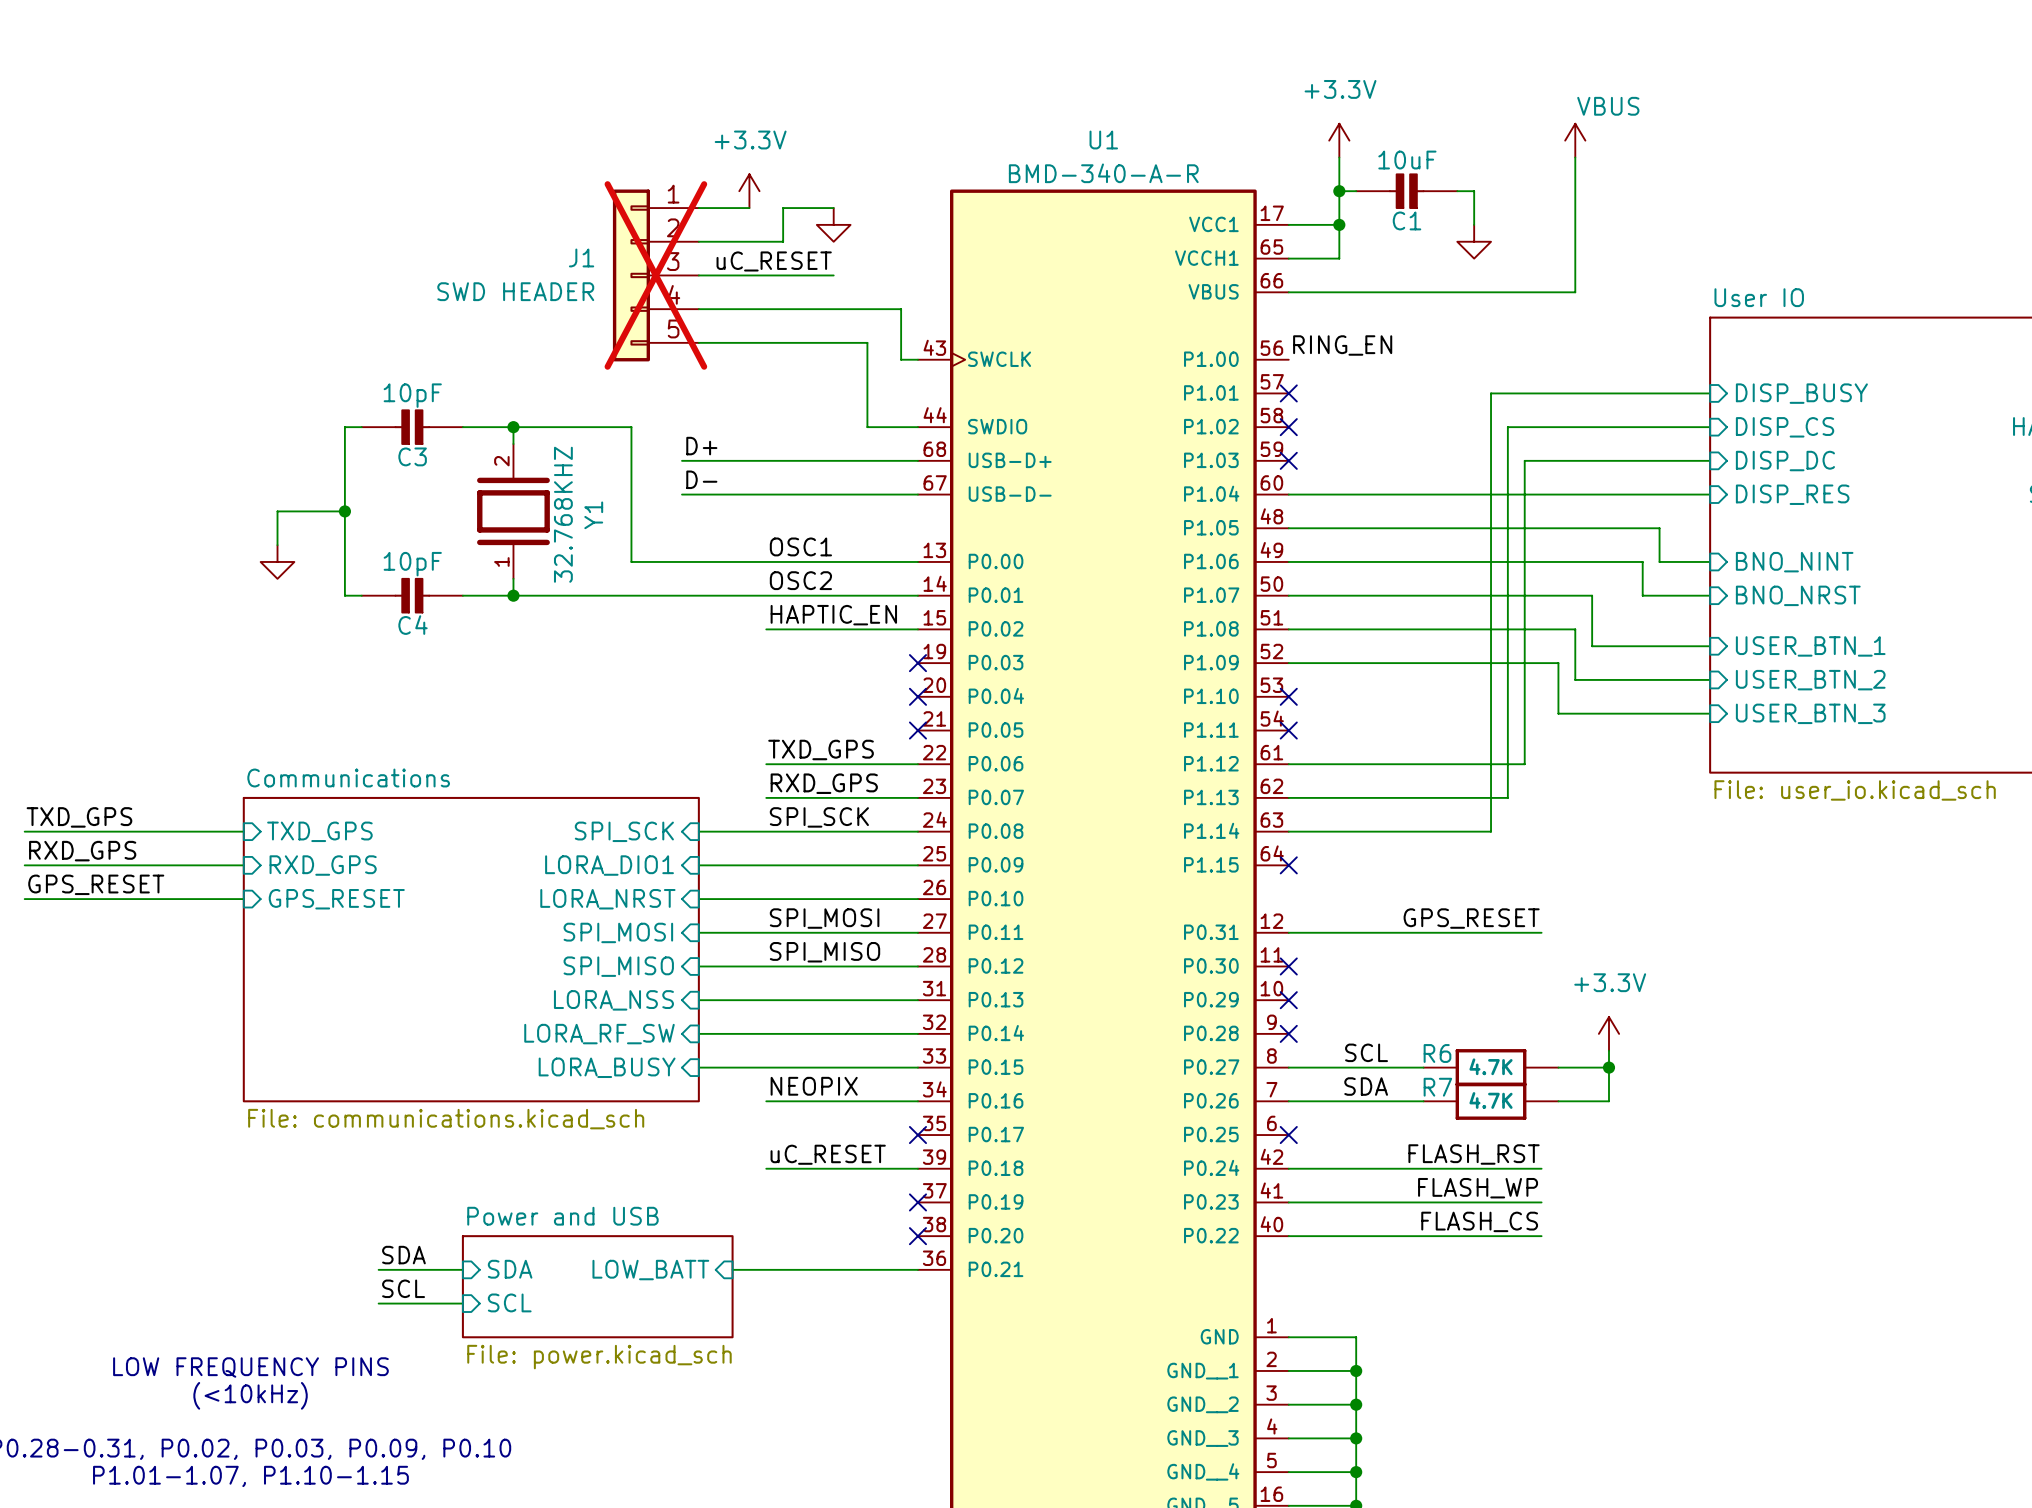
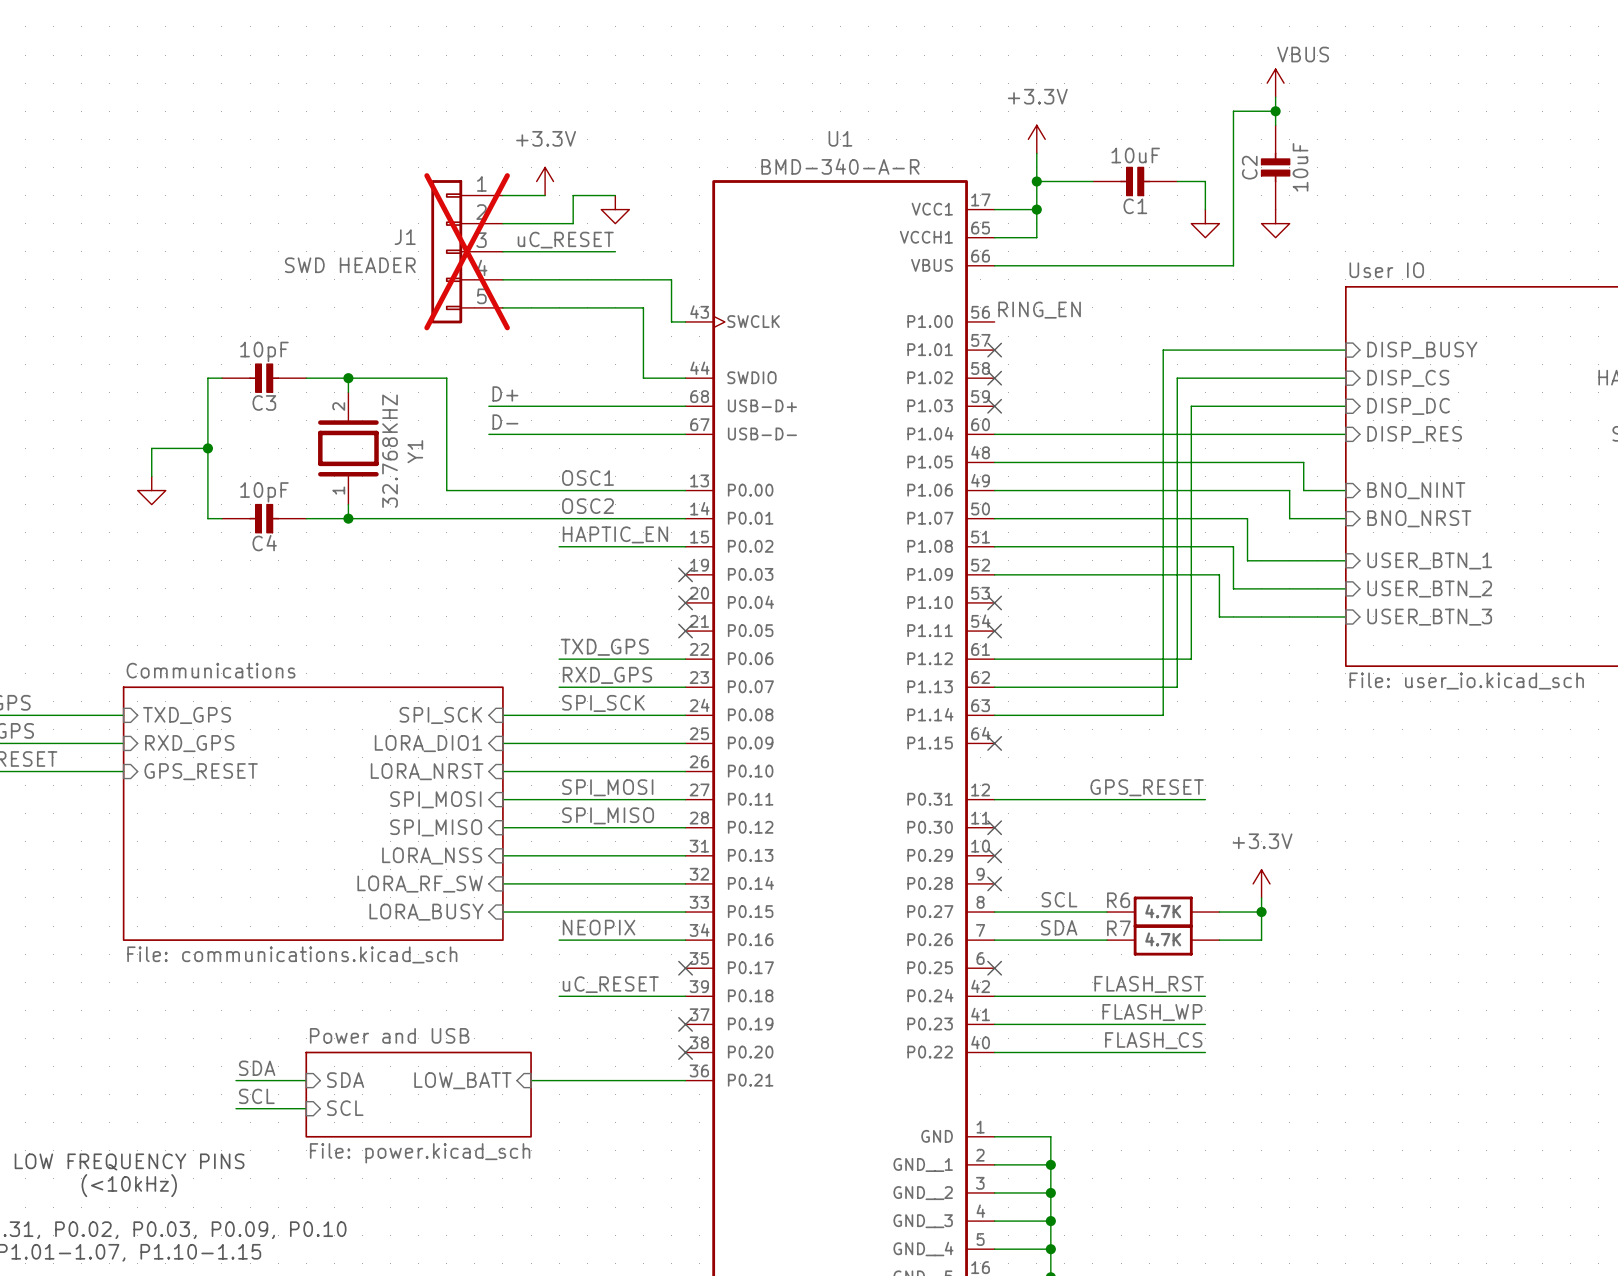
wire: none -> (1275, 97) (1275, 125)
wire: none -> (1275, 111) (1233, 111) (1233, 153)
junction: none -> (1275, 111)
power symbol position: VBUS (1575, 140) -> VBUS (1275, 83)
C2: none -> 10uF (1275, 167)
C1 position: (1406, 191) -> (1135, 181)
wire: (1457, 191) (1474, 191) (1474, 224) -> none
wire: none -> (1177, 181) (1205, 181) (1205, 209)
power symbol position: (1474, 241) -> (1205, 223)
power symbol: none -> (1275, 223)

